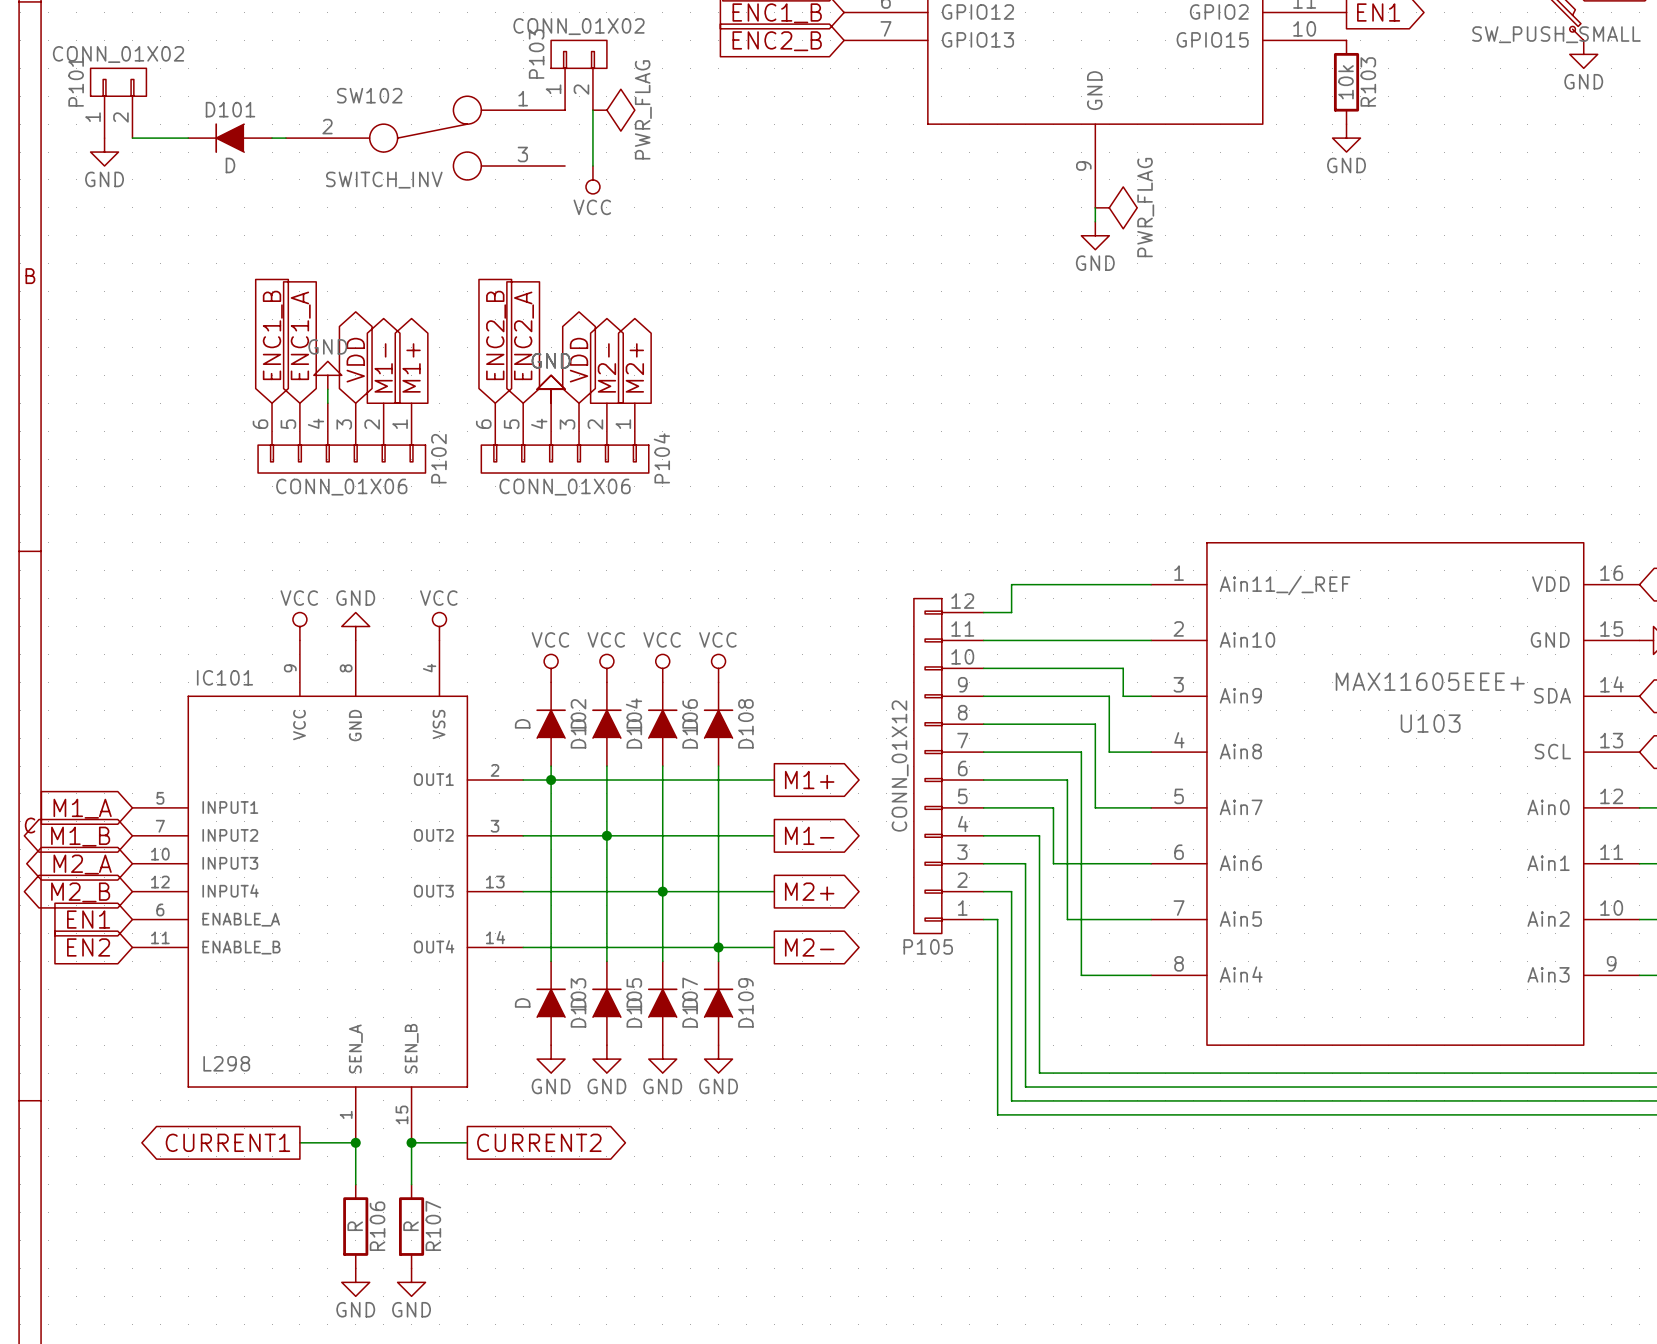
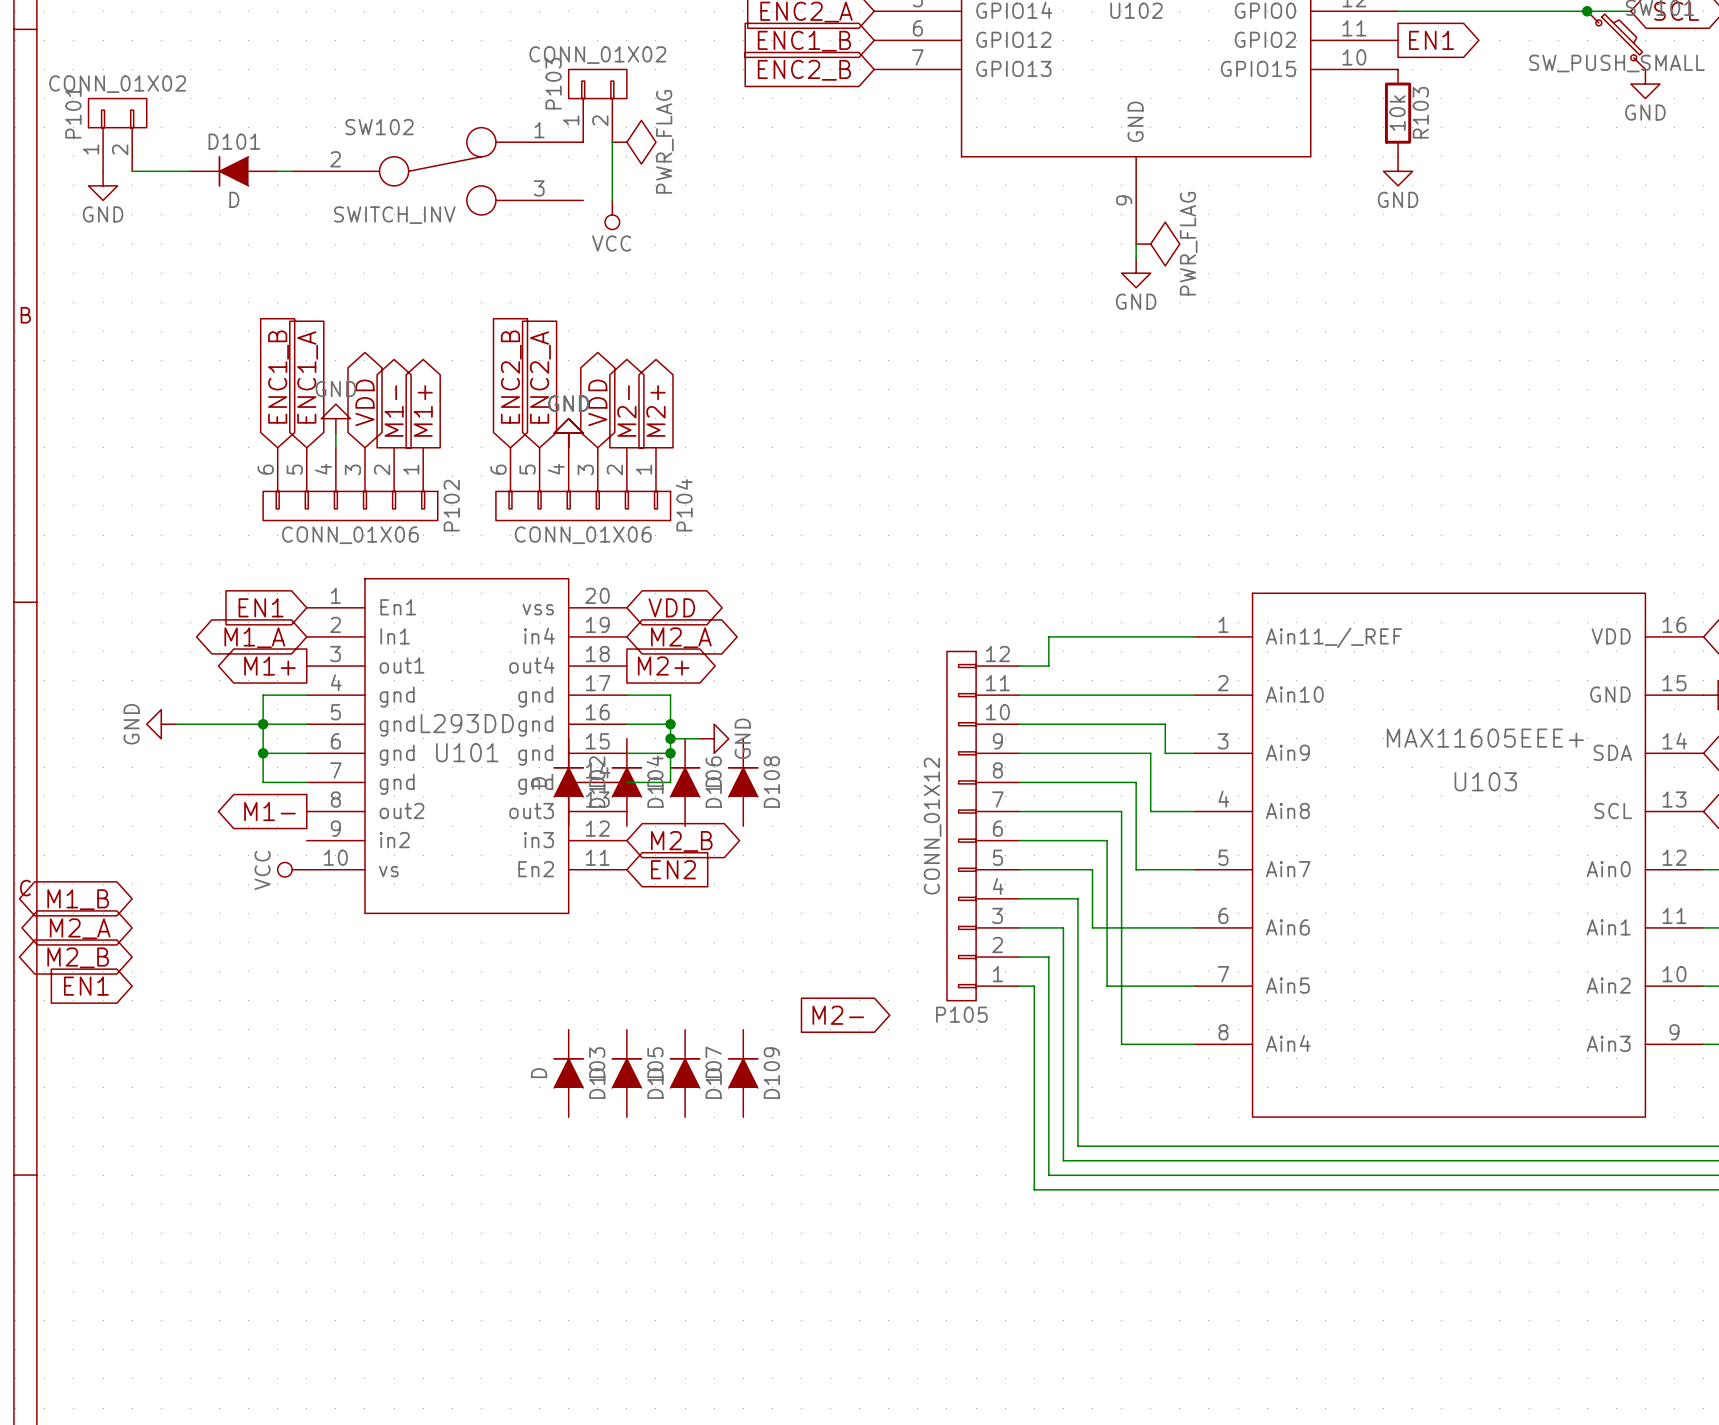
global label: none -> EN1 (261, 607)
global label: none -> VDD (671, 607)
global label: none -> M1_A (254, 637)
global label: none -> M2_A (681, 637)
global label: none -> M1+ (269, 666)
global label: none -> M2+ (663, 666)
power symbol: VCC (299, 626) -> none
power symbol: GND (355, 626) -> none
power symbol: VCC (439, 626) -> none
wire: none -> (306, 695) (263, 695) (263, 782) (306, 782)
wire: none -> (626, 695) (670, 695) (670, 782) (626, 782)
power symbol: none -> GND (161, 724)
wire: none -> (175, 724) (306, 724)
junction: none -> (263, 724)
power symbol: VCC (551, 668) -> none
wire: none -> (626, 724) (670, 724)
power symbol: VCC (606, 668) -> none
junction: none -> (670, 724)
power symbol: VCC (662, 668) -> none
power symbol: VCC (718, 668) -> none
wire: none -> (670, 738) (699, 738)
junction: none -> (670, 738)
power symbol: none -> GND (714, 738)
U101: none -> L293DD (466, 746)
junction: none -> (263, 753)
wire: none -> (626, 753) (670, 753)
junction: none -> (670, 753)
global label: none -> M1- (269, 811)
wire: (551, 766) (551, 961) -> none
wire: (606, 766) (606, 961) -> none
wire: (662, 766) (662, 961) -> none
wire: (718, 766) (718, 961) -> none
wire: (523, 780) (774, 780) -> none
junction: (551, 780) -> none
global label: none -> M2_B (681, 841)
global label: M1+ (809, 780) -> none
power symbol: none -> VCC (292, 869)
global label: none -> EN2 (673, 869)
global label: M1_A (82, 808) -> none
wire: (523, 835) (774, 835) -> none
junction: (606, 835) -> none
global label: M1- (809, 835) -> none
IC101: L298 (327, 891) -> none
wire: (523, 891) (774, 891) -> none
junction: (662, 891) -> none
global label: M2+ (809, 891) -> none
global label: EN2 (88, 947) -> none
wire: (523, 947) (774, 947) -> none
junction: (718, 947) -> none
power symbol: GND (551, 1059) -> none
power symbol: GND (606, 1059) -> none
power symbol: GND (662, 1059) -> none
power symbol: GND (718, 1059) -> none
global label: CURRENT1 (227, 1142) -> none
wire: (299, 1142) (355, 1142) (355, 1184) -> none
junction: (355, 1142) -> none
junction: (411, 1142) -> none
wire: (467, 1142) (411, 1142) (411, 1184) -> none
global label: CURRENT2 (539, 1142) -> none
R106: R (355, 1226) -> none
R107: R (411, 1226) -> none
power symbol: GND (355, 1282) -> none
power symbol: GND (411, 1282) -> none

